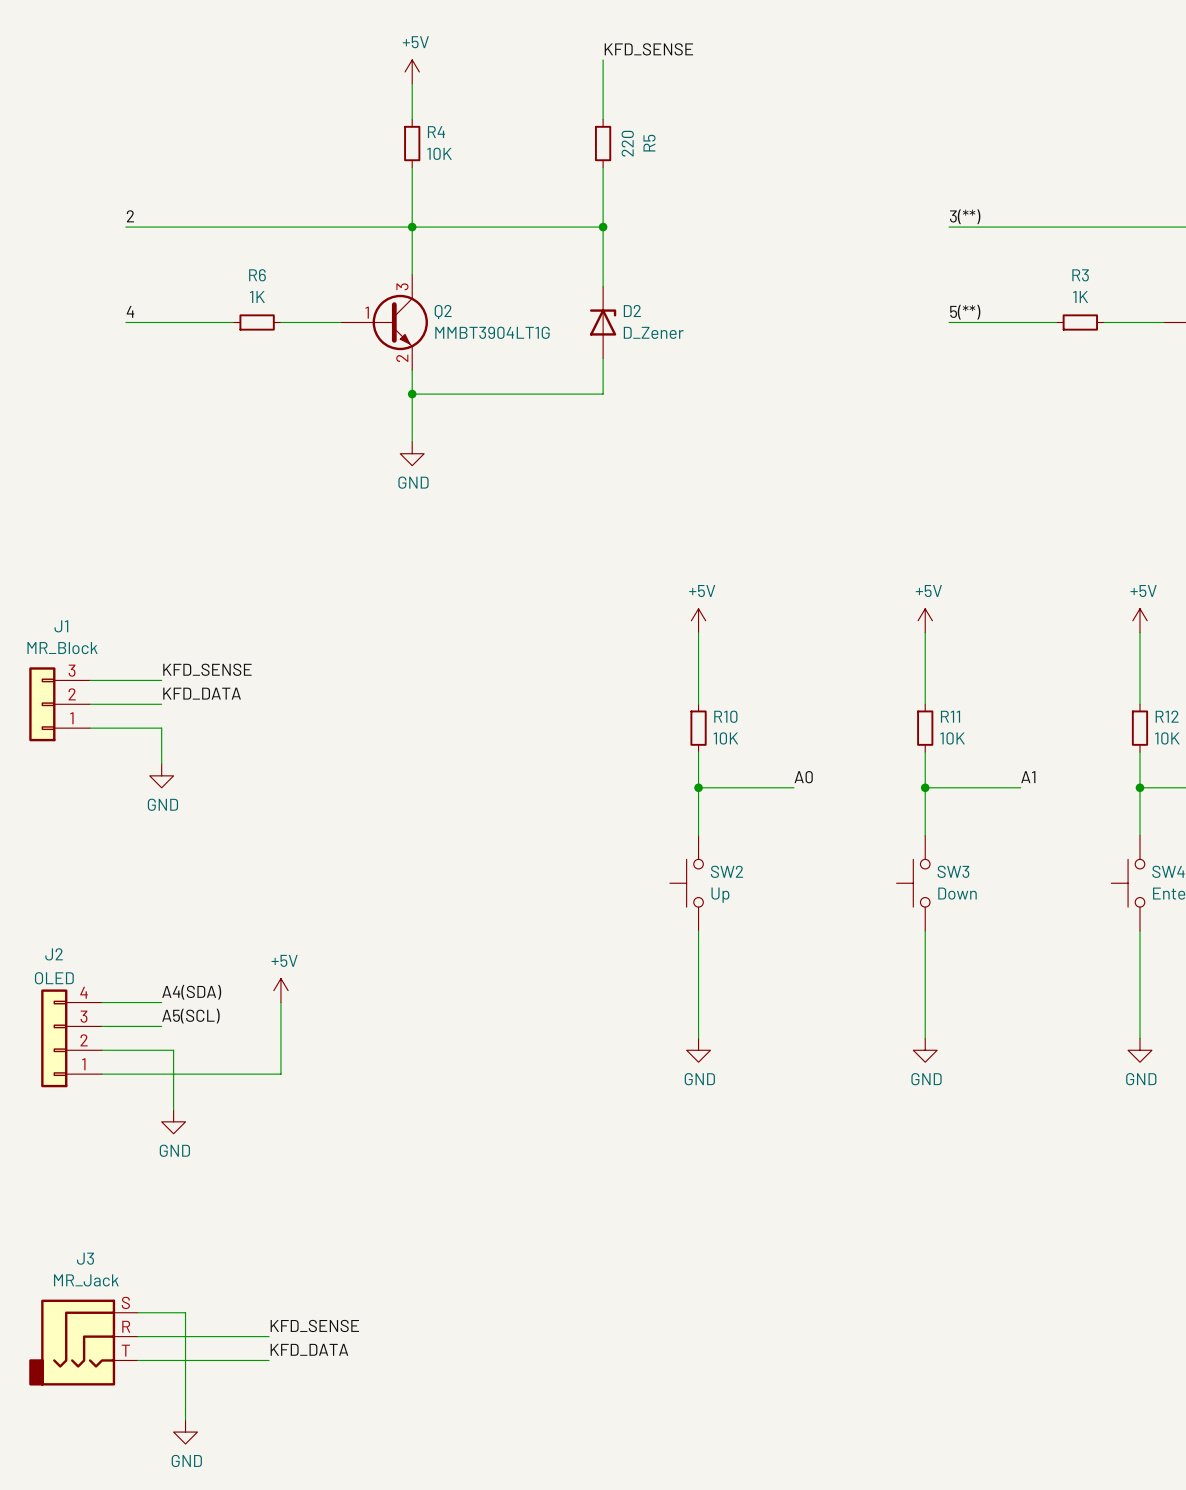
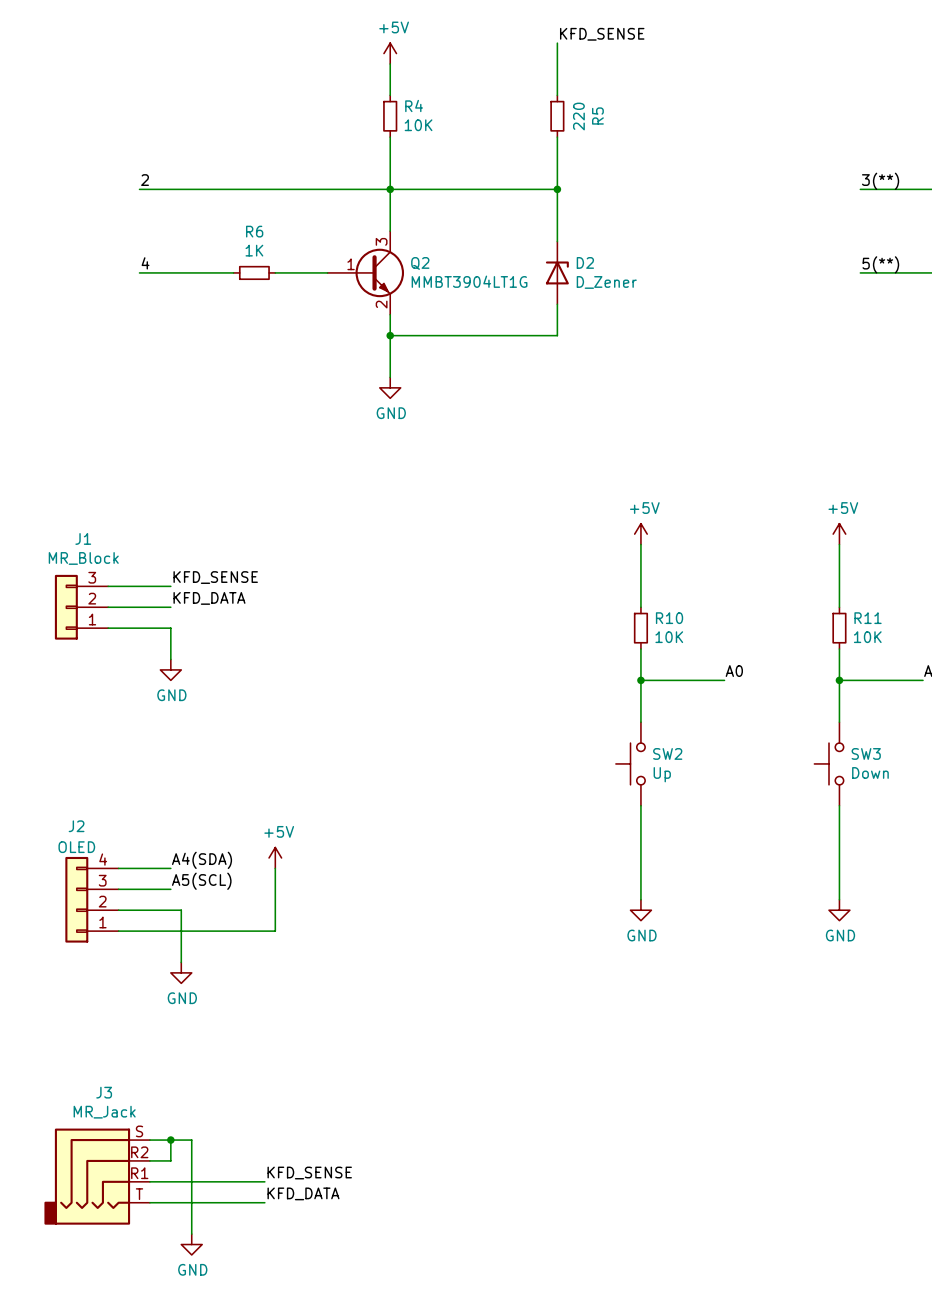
J3 symbol: [29, 1299, 138, 1386] -> [44, 1128, 150, 1225]
junction: none -> (170, 1140)
label: KFD_SENSE (314, 1325) -> none
wire: (161, 1336) (269, 1336) -> (170, 1160) (170, 1140)
label: KFD_DATA (309, 1349) -> KFD_SENSE (309, 1173)
label: none -> KFD_DATA (303, 1193)
wire: none -> (149, 1202) (264, 1202)

